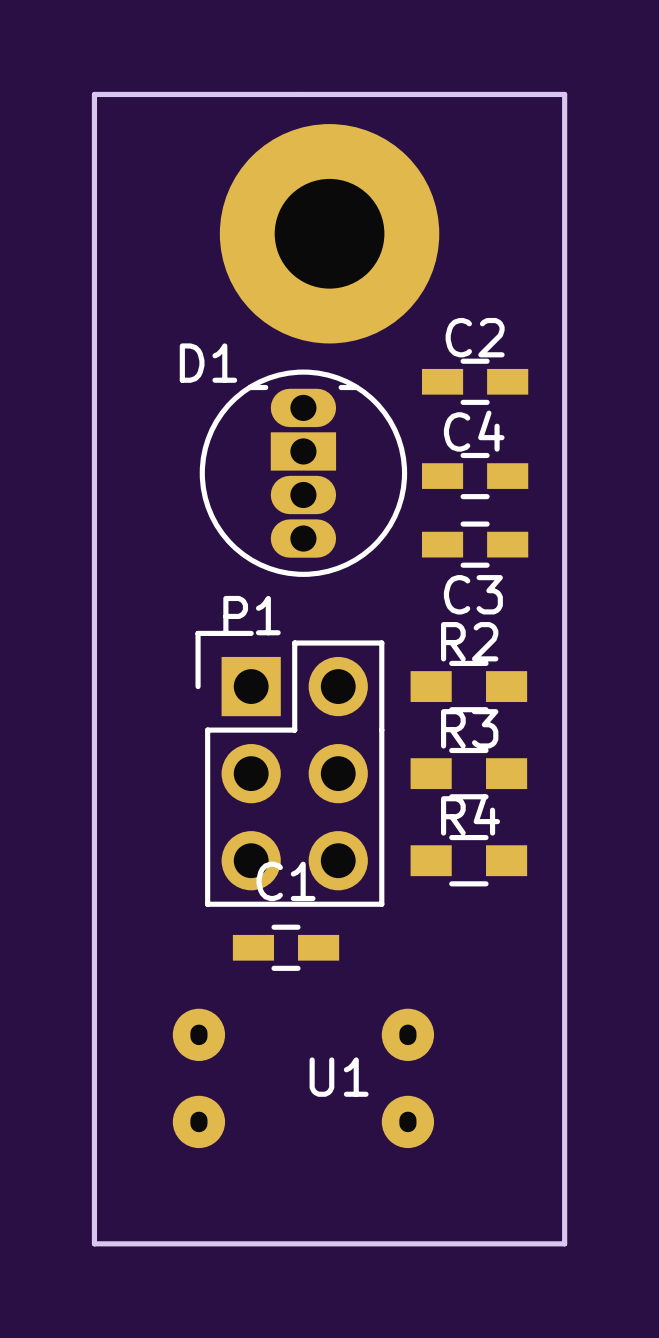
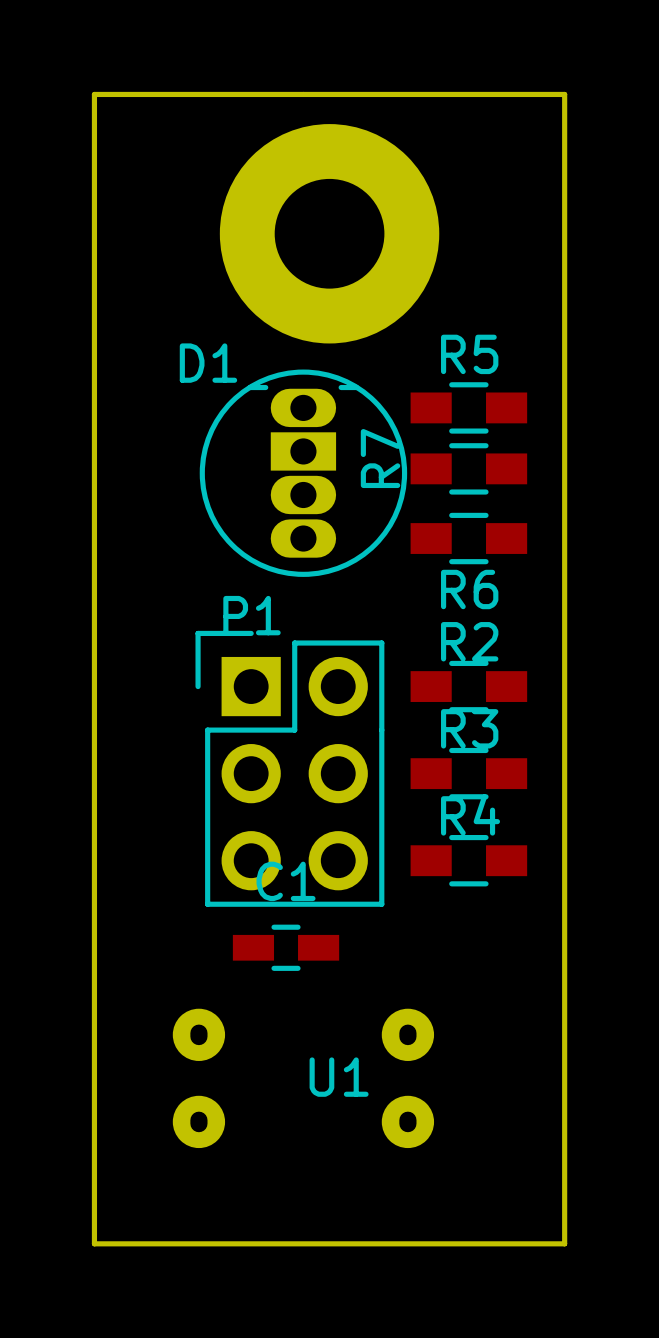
C2: (475, 381) -> none
R5: none -> (468, 407)
R7: none -> (468, 468)
C4: (475, 476) -> none
R6: none -> (468, 538)
C3: (475, 544) -> none

